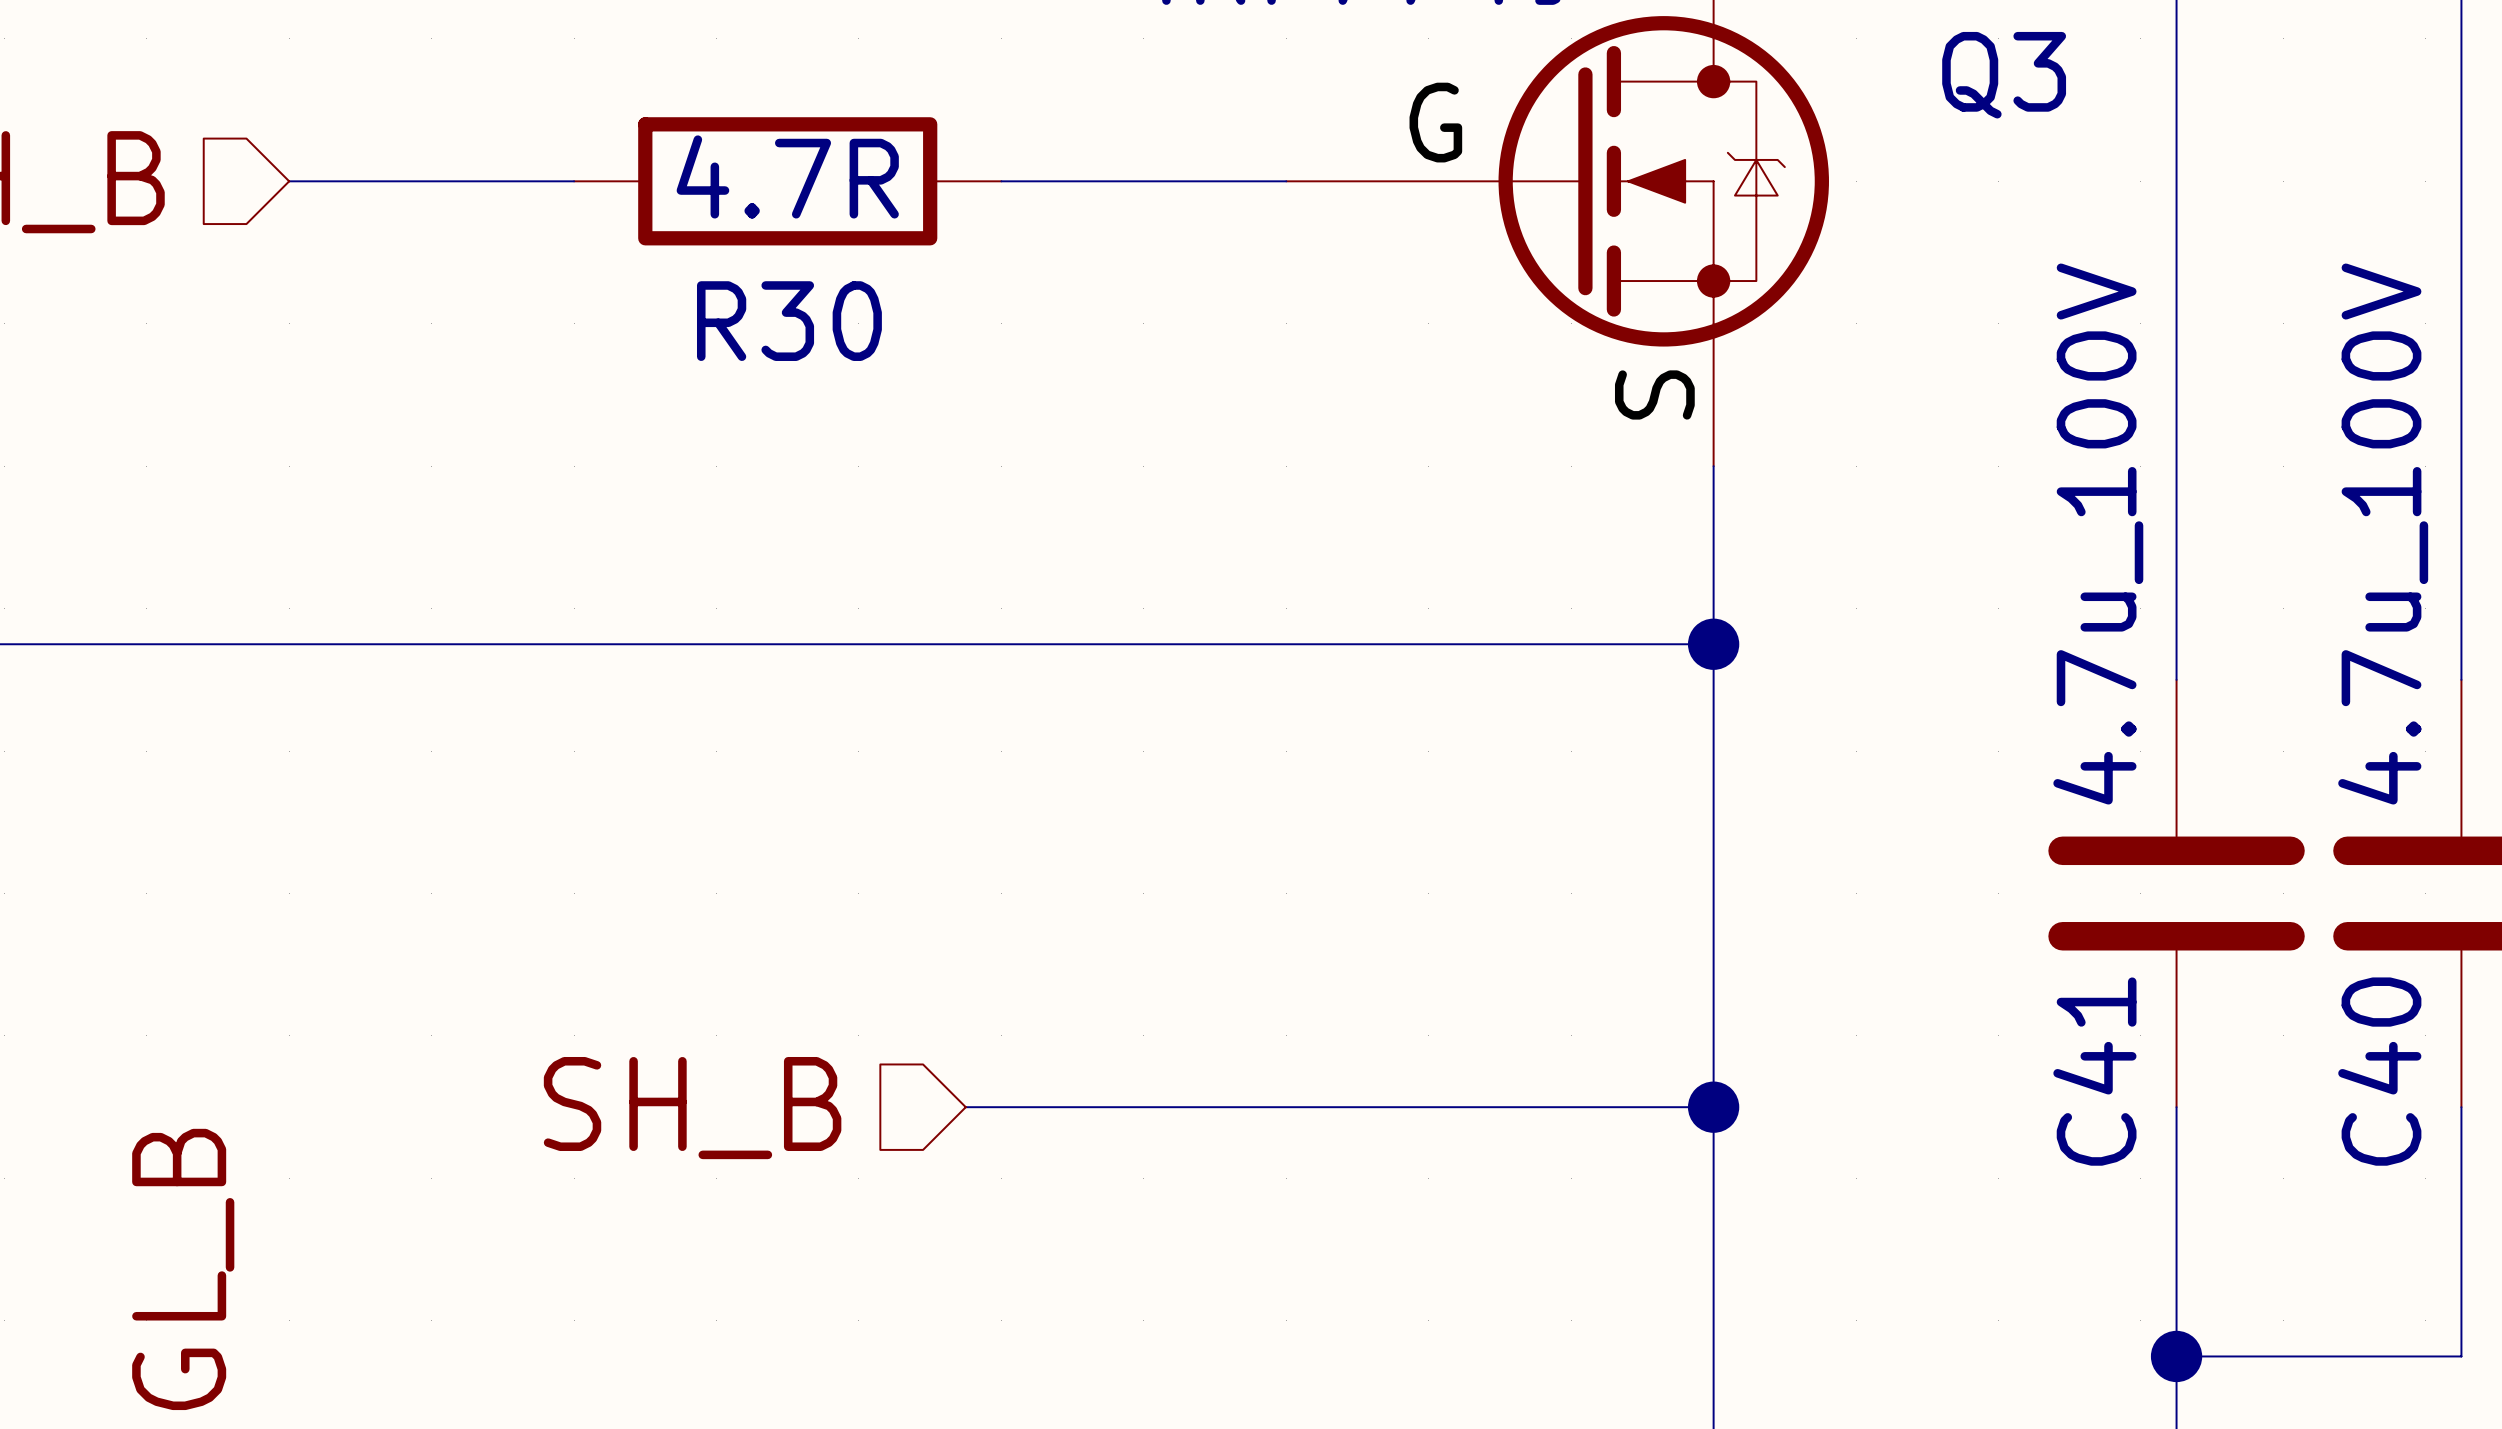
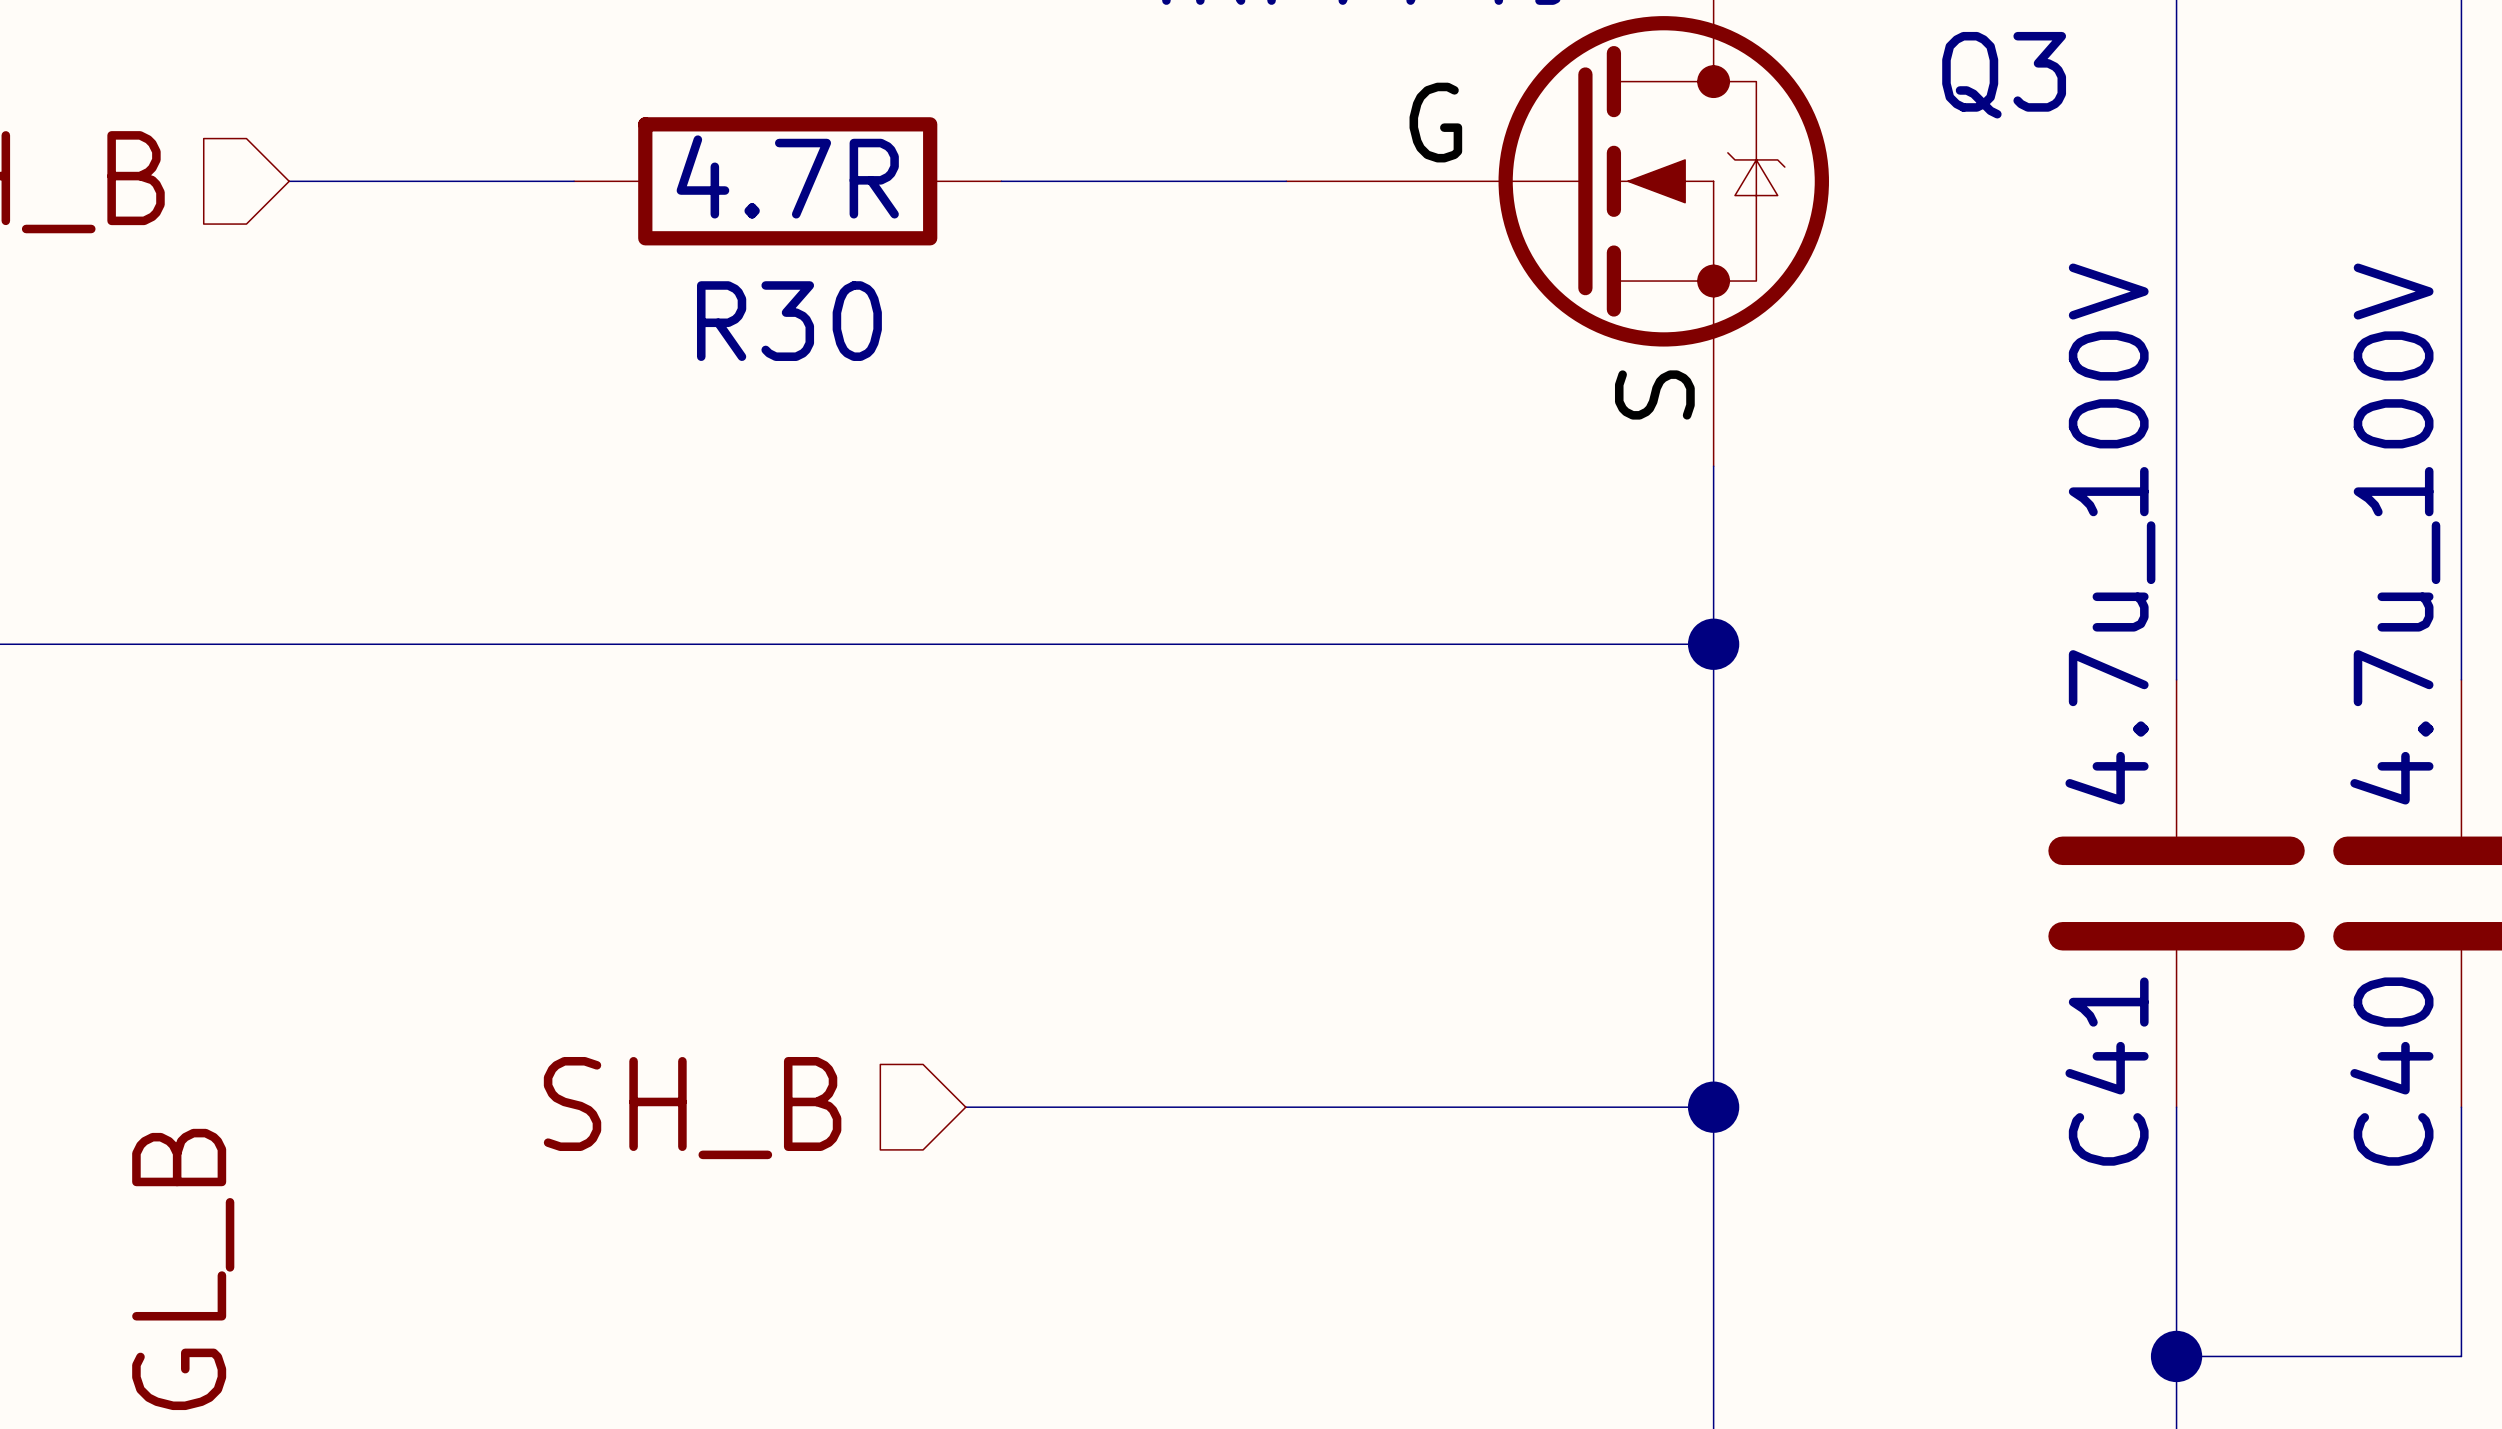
C41 value position: 4.7u_100V (2098, 534) -> 4.7u_100V (2110, 534)
C40 value position: 4.7u_100V (2383, 534) -> 4.7u_100V (2395, 534)
C41 name position: C41 (2094, 1071) -> C41 (2107, 1071)
C40 name position: C40 (2379, 1071) -> C40 (2391, 1071)

